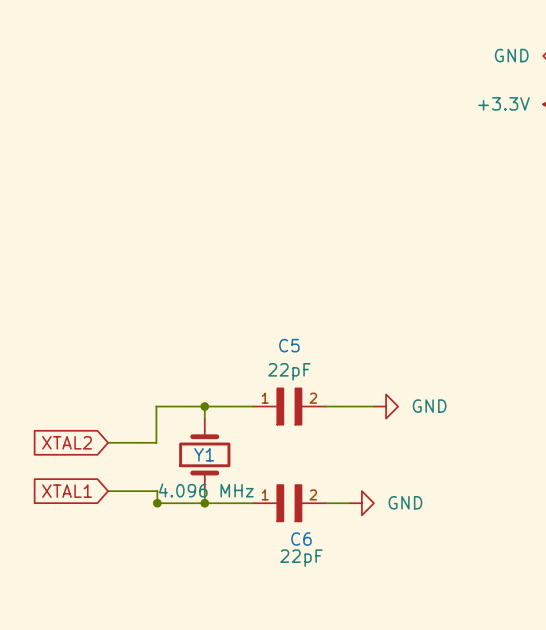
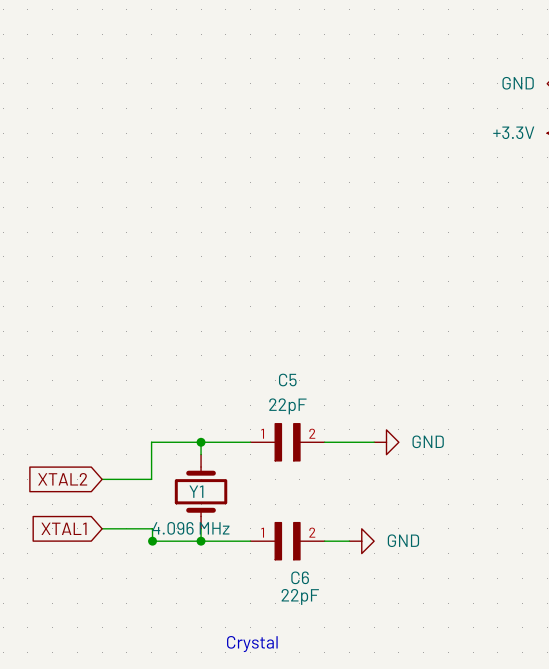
text: none -> Crystal (252, 644)

